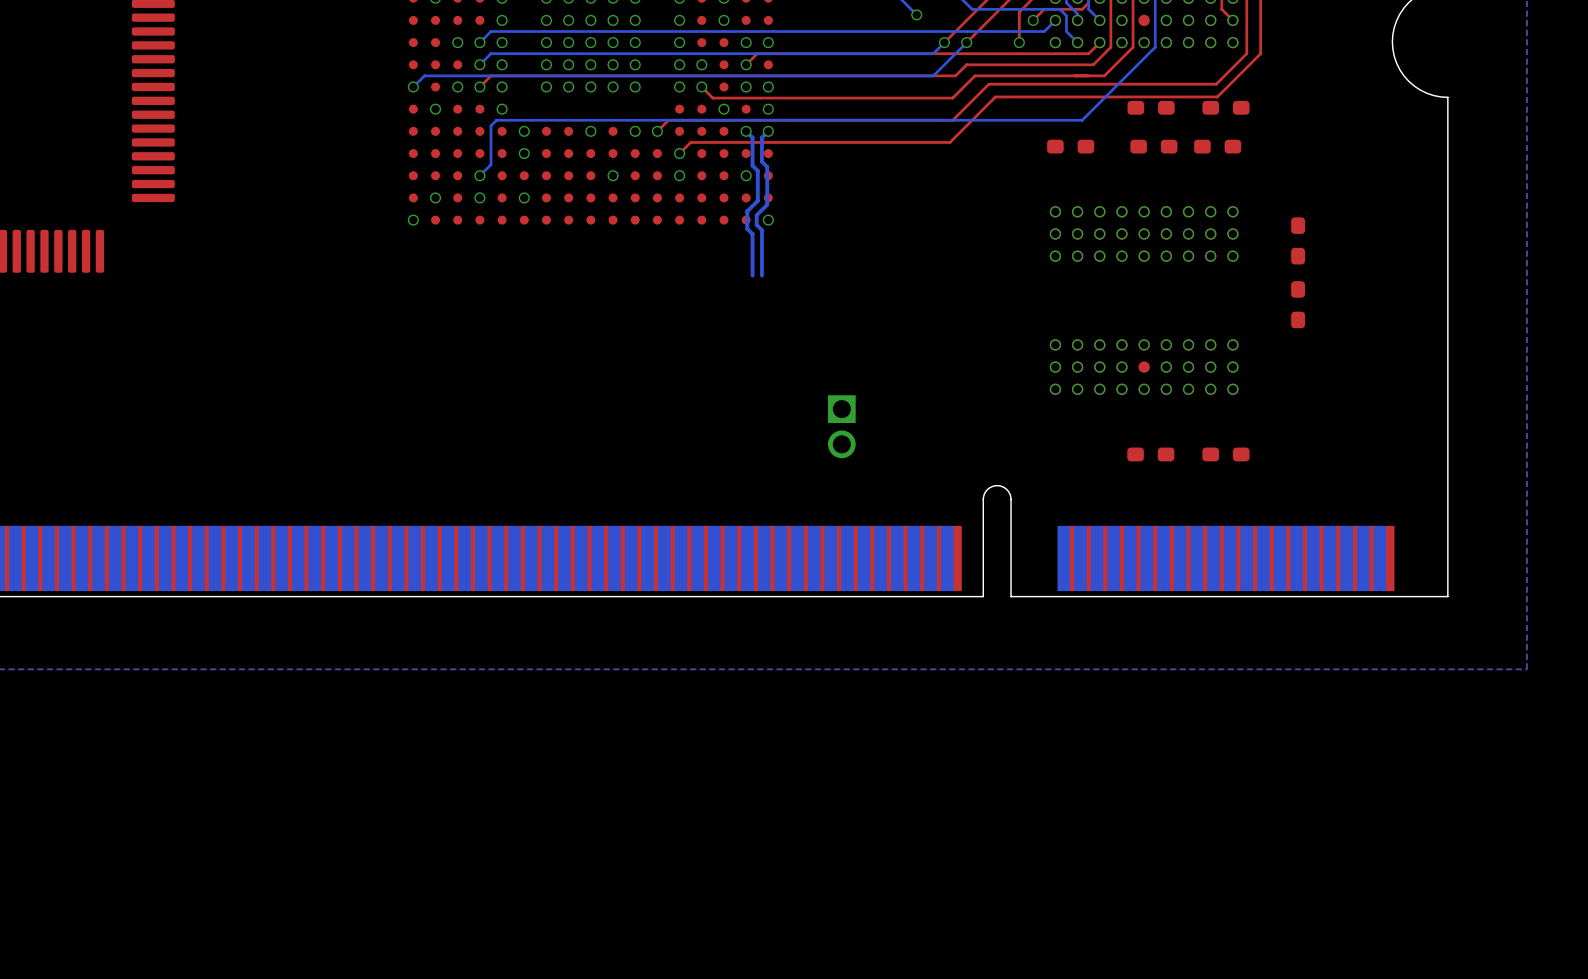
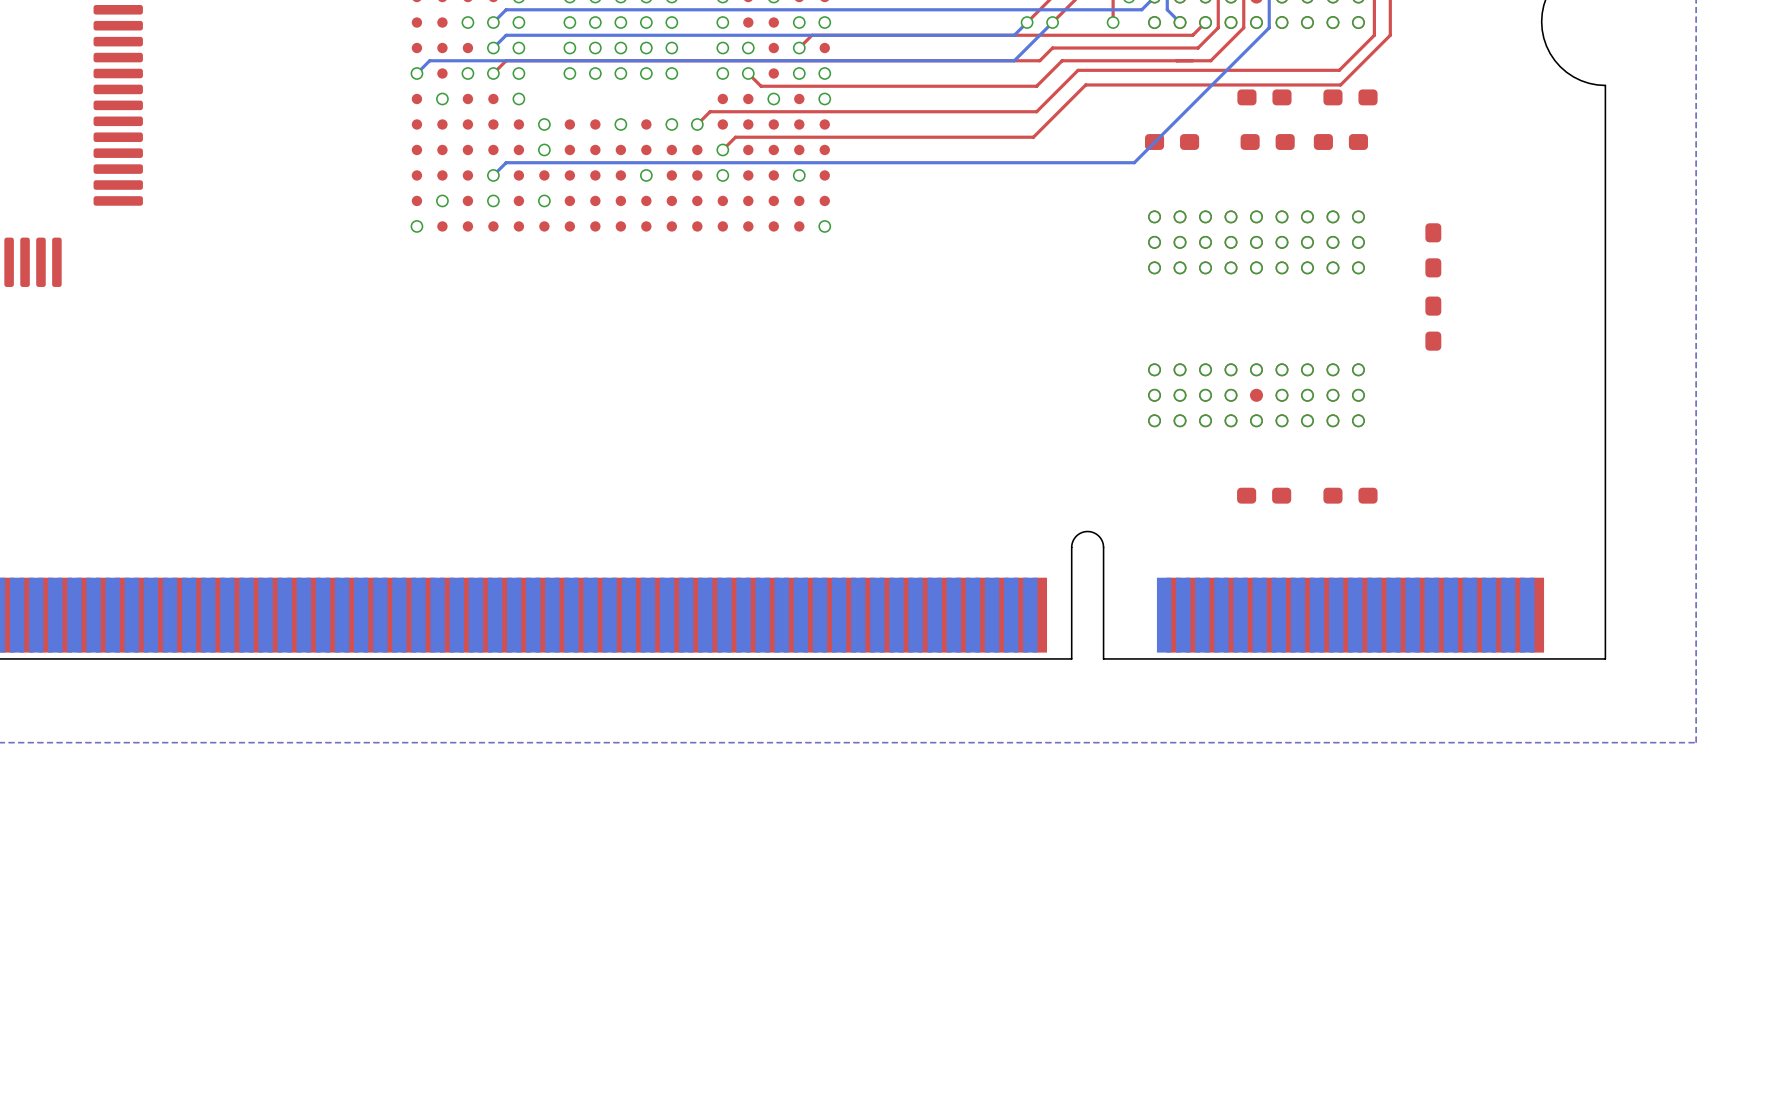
bottom track: (1082, 120) (496, 120) (491, 125) (491, 164) -> (1185, 111) (1134, 162) (506, 162)
bottom track: (746, 131) (752, 137) (752, 165) (757, 170) (757, 200) (747, 211) (747, 228) (752, 234) (752, 275) -> none
via: (746, 131) -> none
bottom track: (768, 131) (761, 137) (761, 161) (767, 167) (767, 204) (756, 215) (756, 224) (761, 230) (761, 275) -> none
via: (768, 131) -> none
part: (841, 426) -> none

